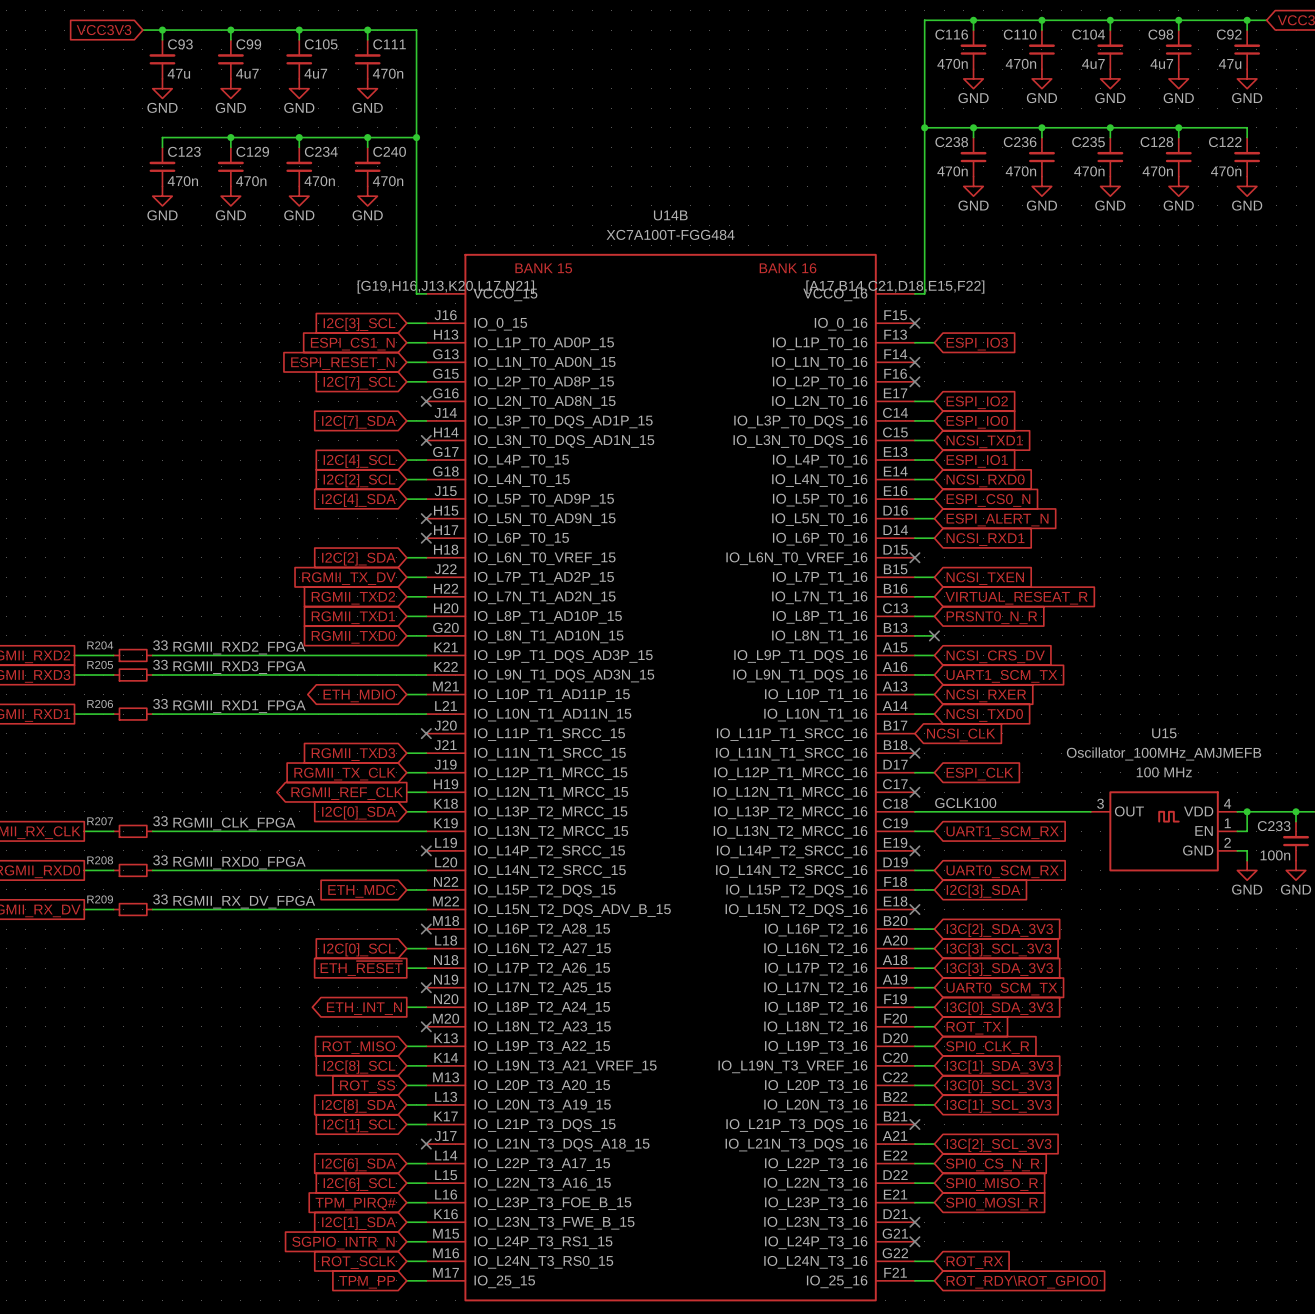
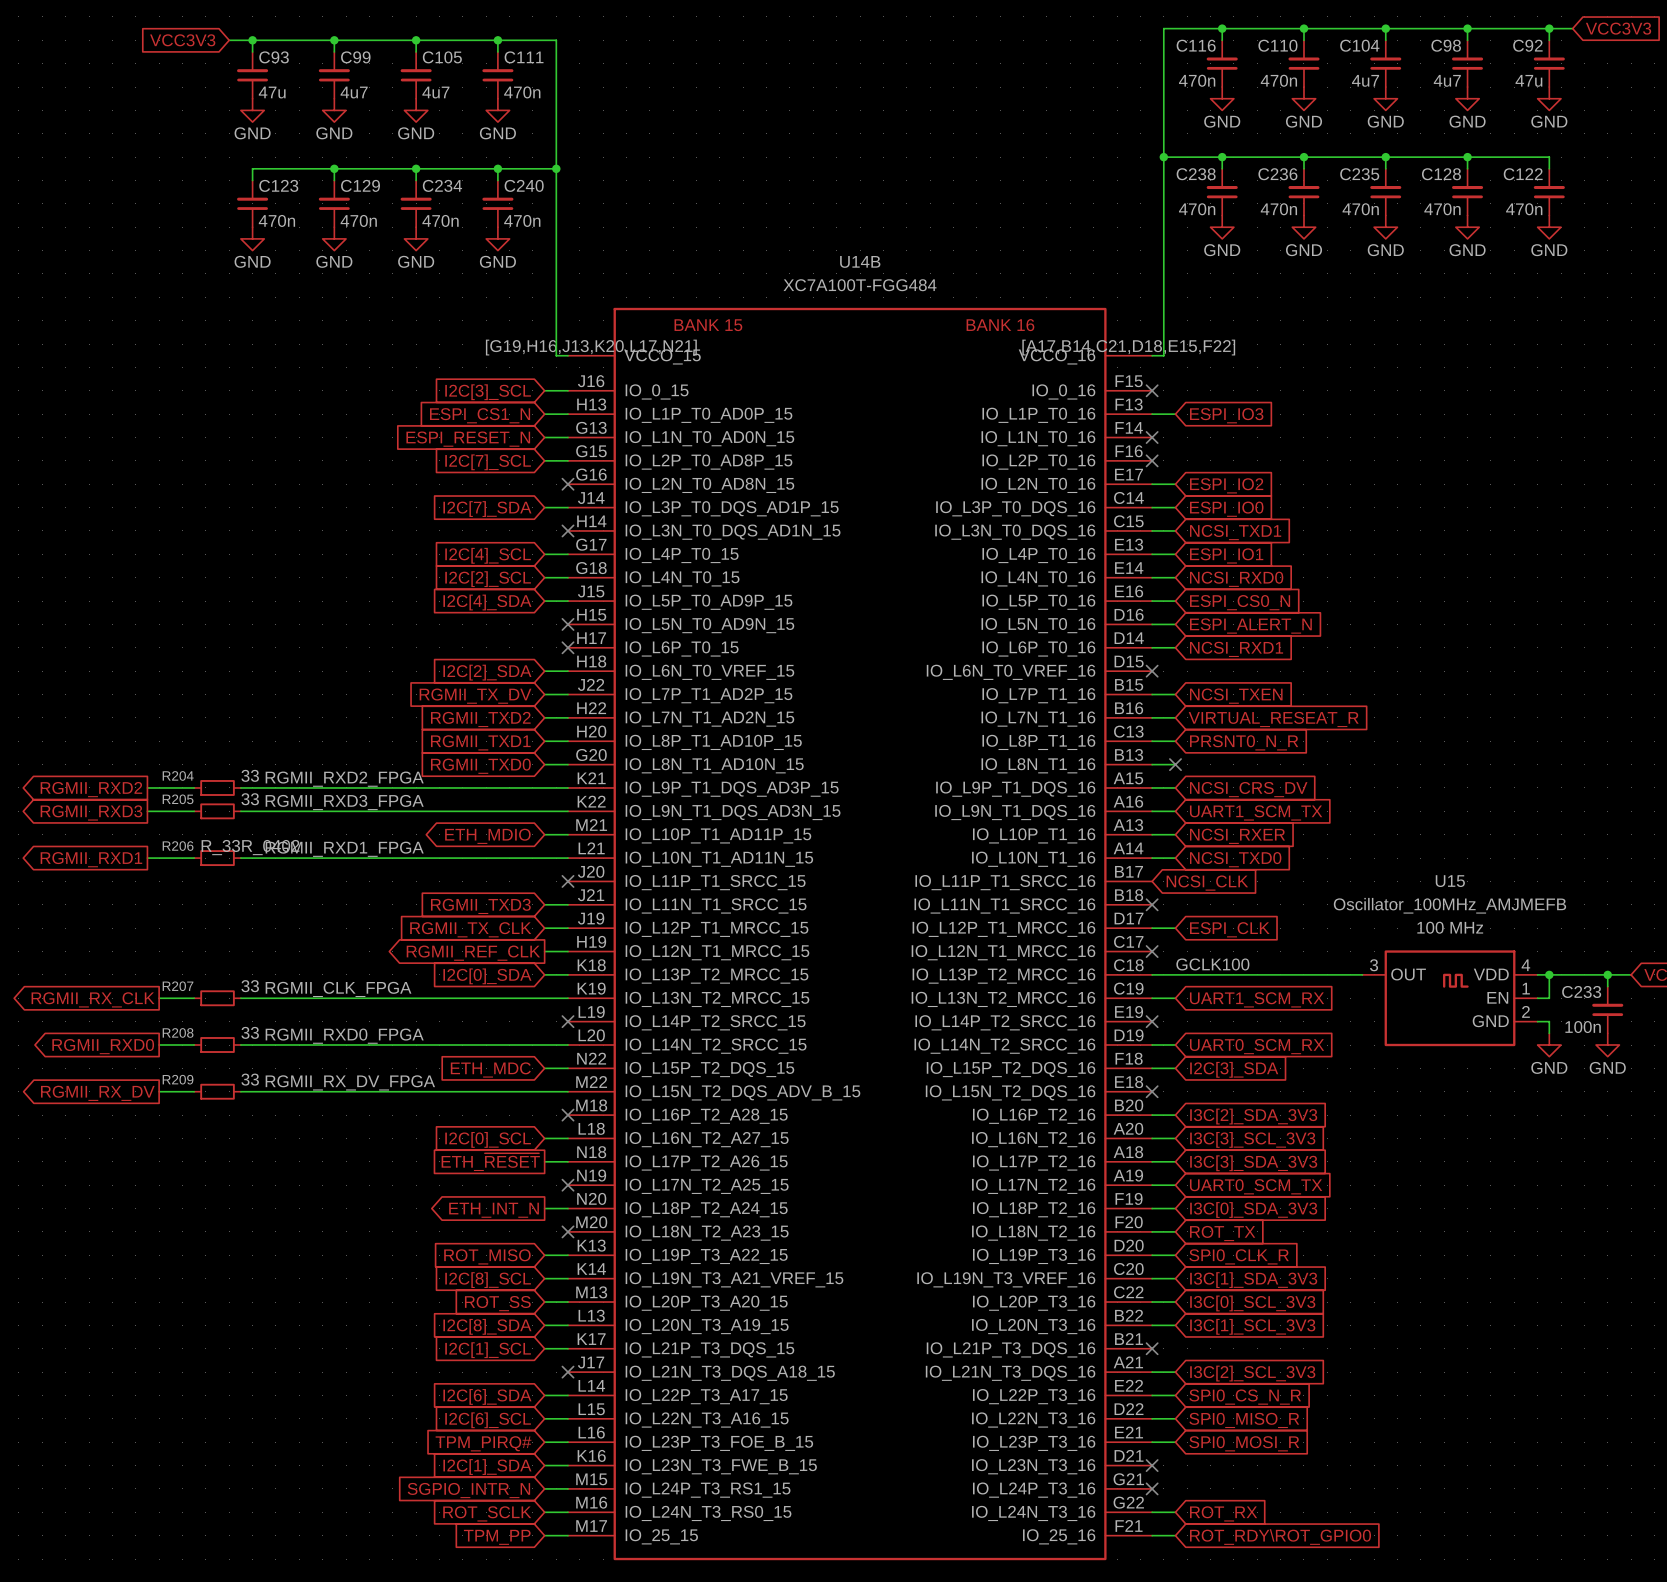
R206 value: 33 (160, 703) -> R_33R_0402 (250, 847)

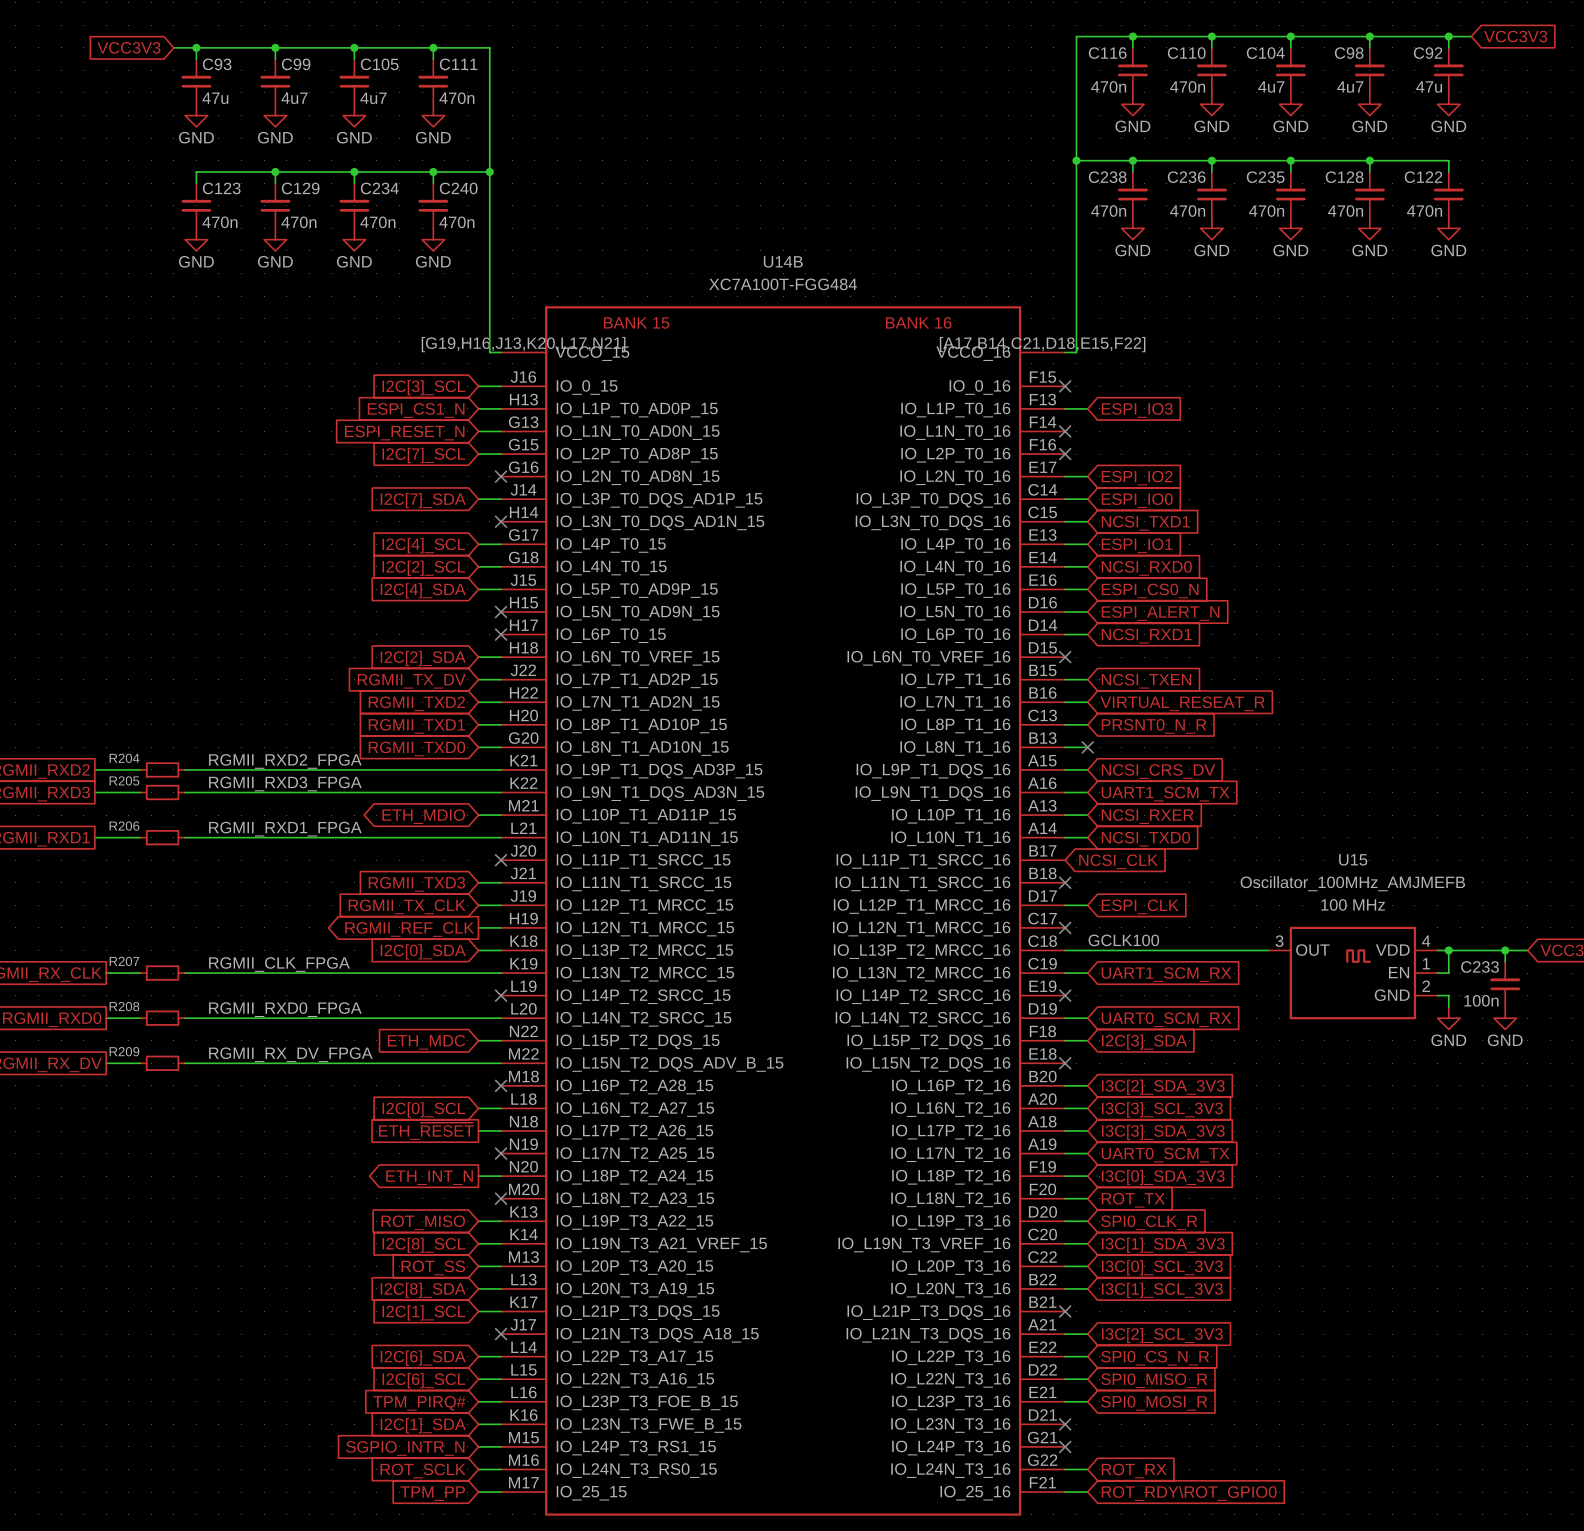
R204 value: 33 (250, 775) -> none
R205 value: 33 (250, 799) -> none
R206 value: R_33R_0402 (250, 847) -> none
R207 value: 33 (250, 986) -> none
R208 value: 33 (250, 1032) -> none
R209 value: 33 (250, 1079) -> none

